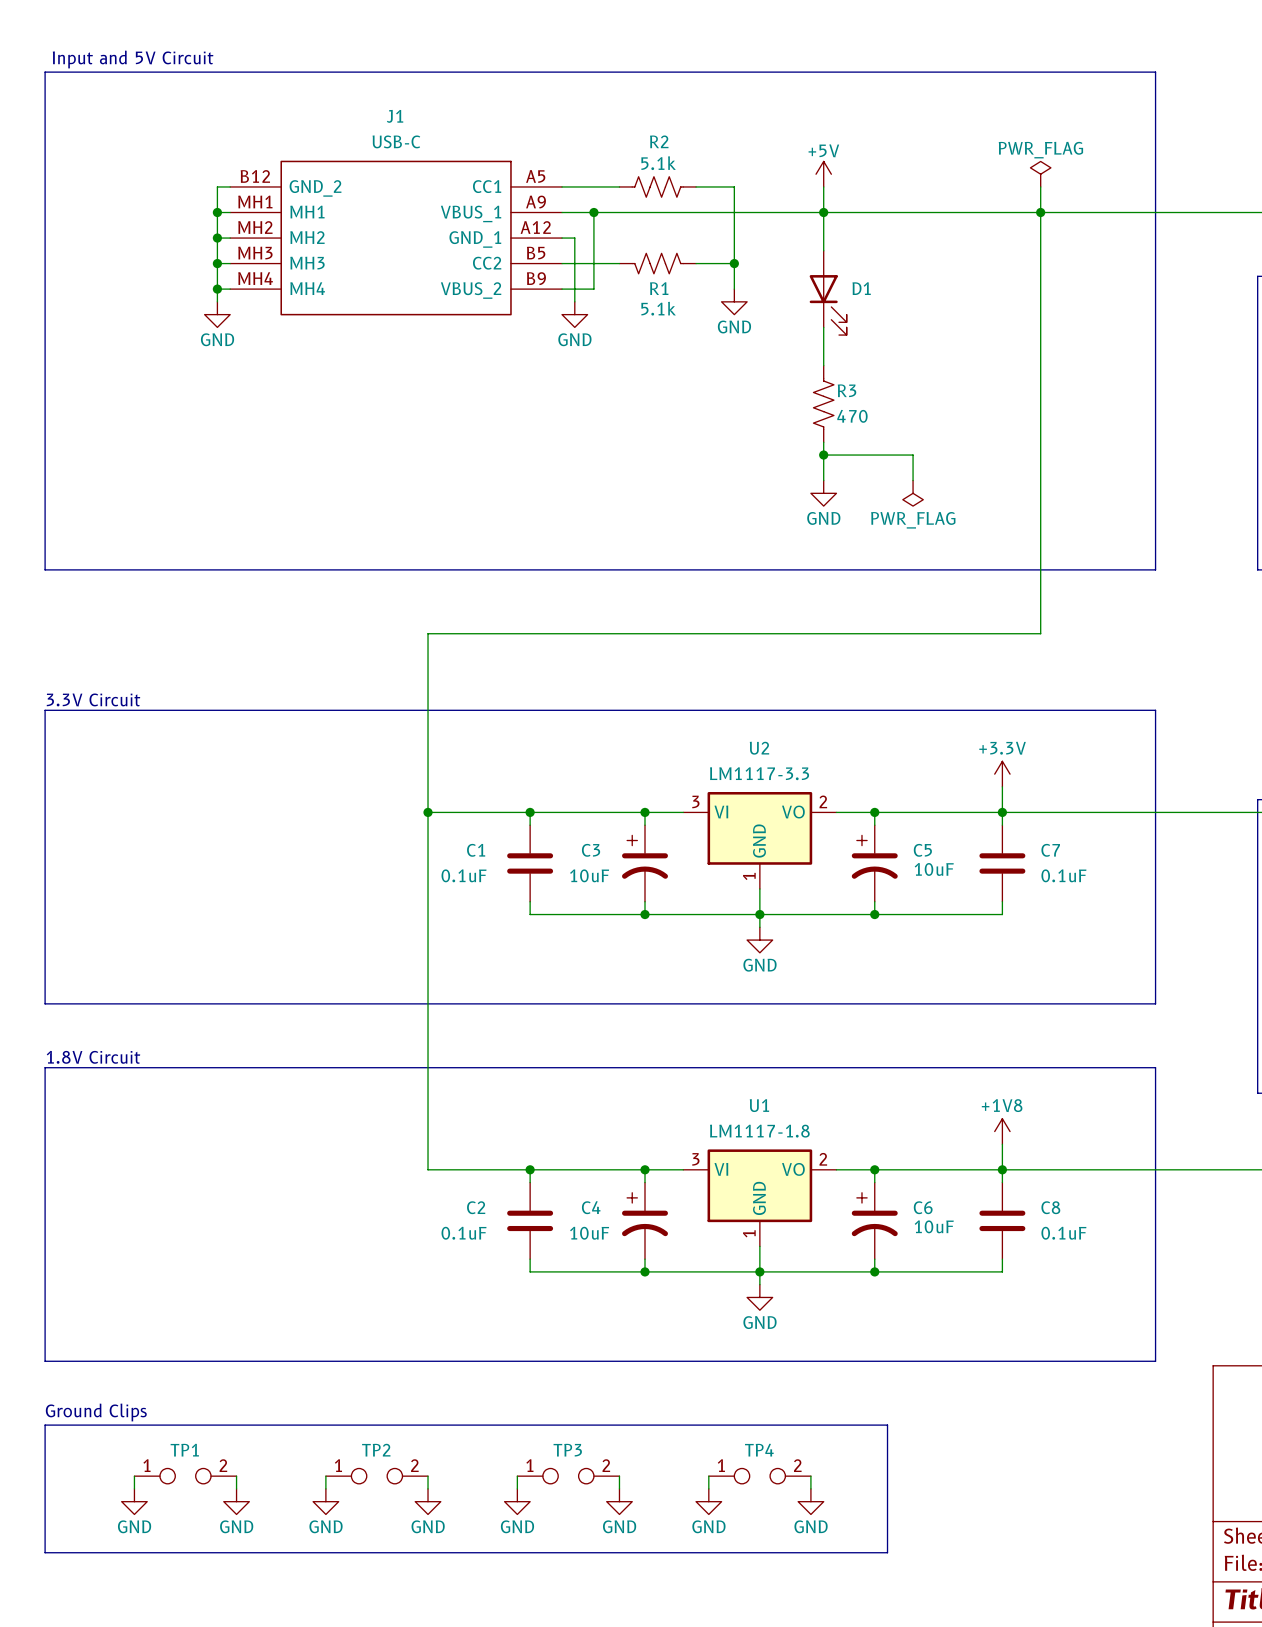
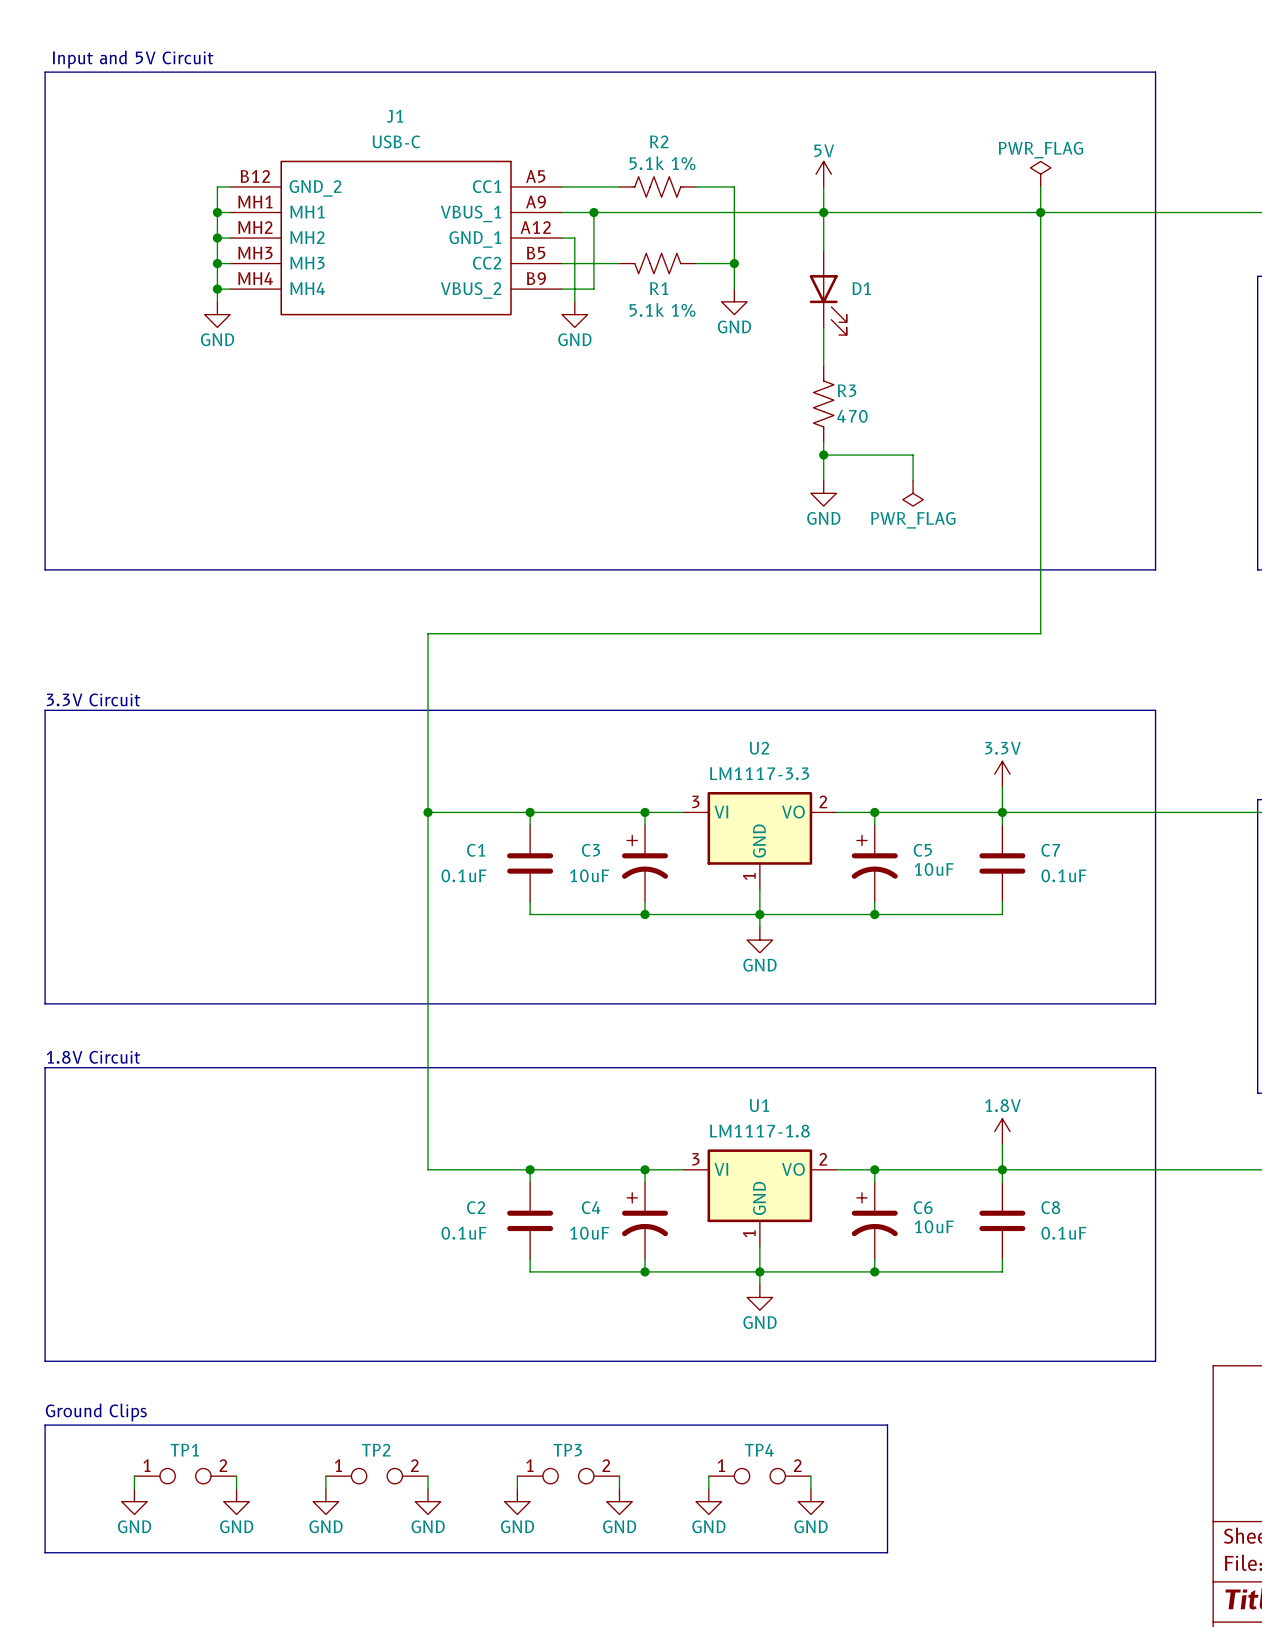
R2 value: 5.1k (658, 163) -> 5.1k 1% (662, 163)
power symbol: +5V (823, 174) -> 5V (823, 174)
R1 value: 5.1k (658, 308) -> 5.1k 1% (662, 309)
power symbol: +3.3V (1002, 774) -> 3.3V (1002, 774)
power symbol: +1V8 (1002, 1131) -> 1.8V (1002, 1131)

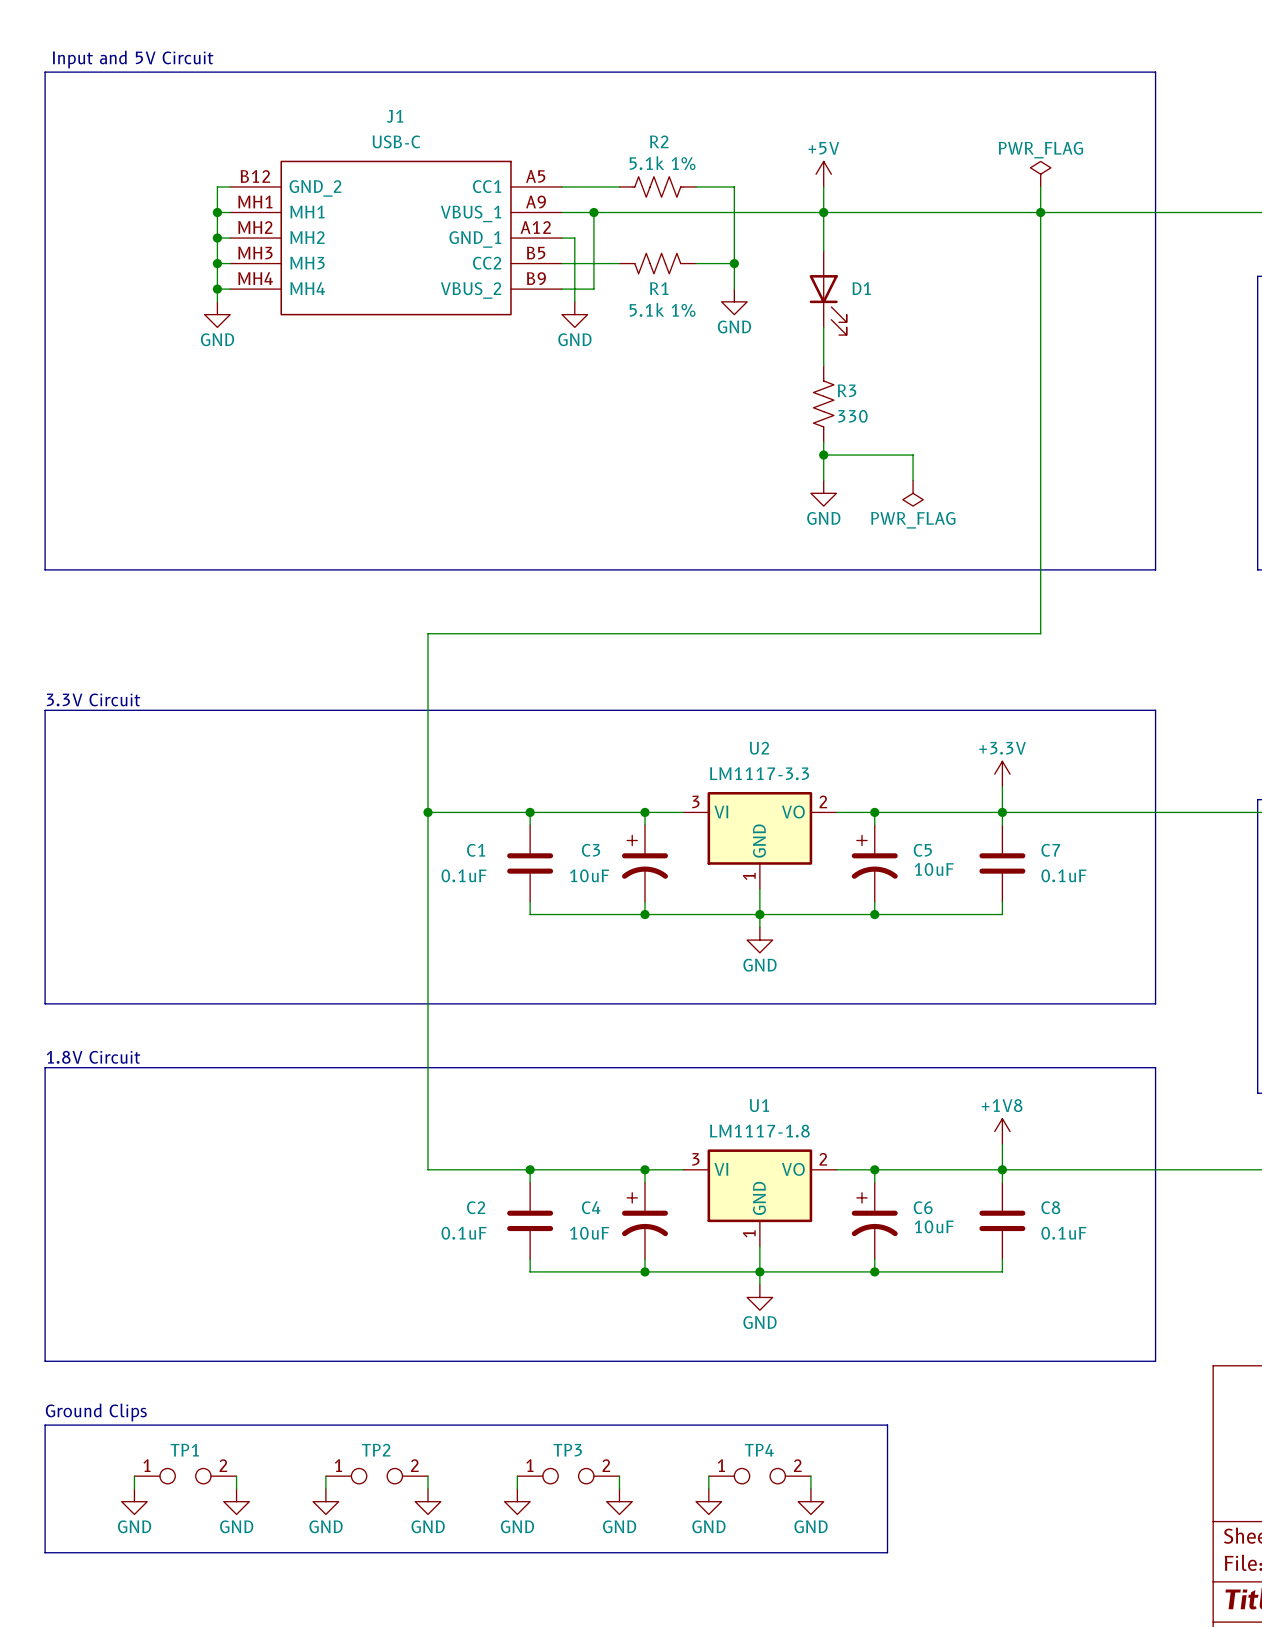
power symbol: 5V (823, 174) -> +5V (823, 174)
R3 value: 470 (852, 416) -> 330 (852, 416)
power symbol: 3.3V (1002, 774) -> +3.3V (1002, 774)
power symbol: 1.8V (1002, 1131) -> +1V8 (1002, 1131)

